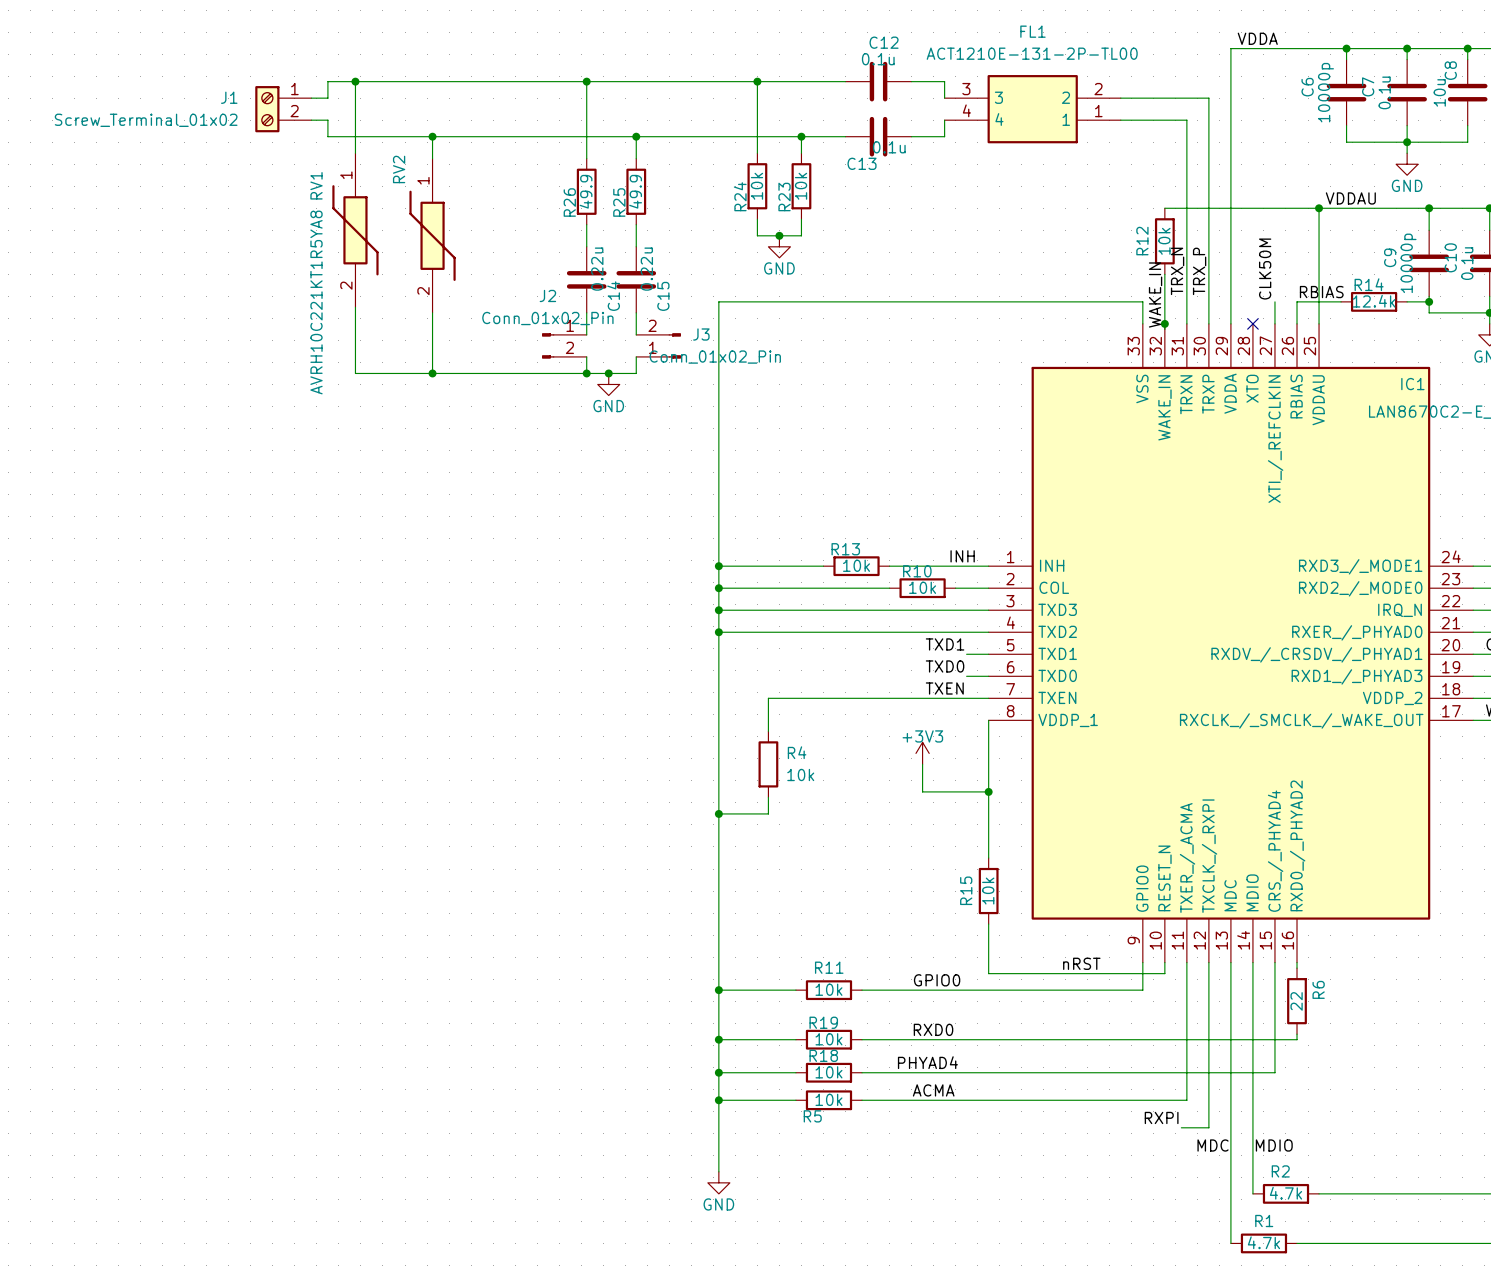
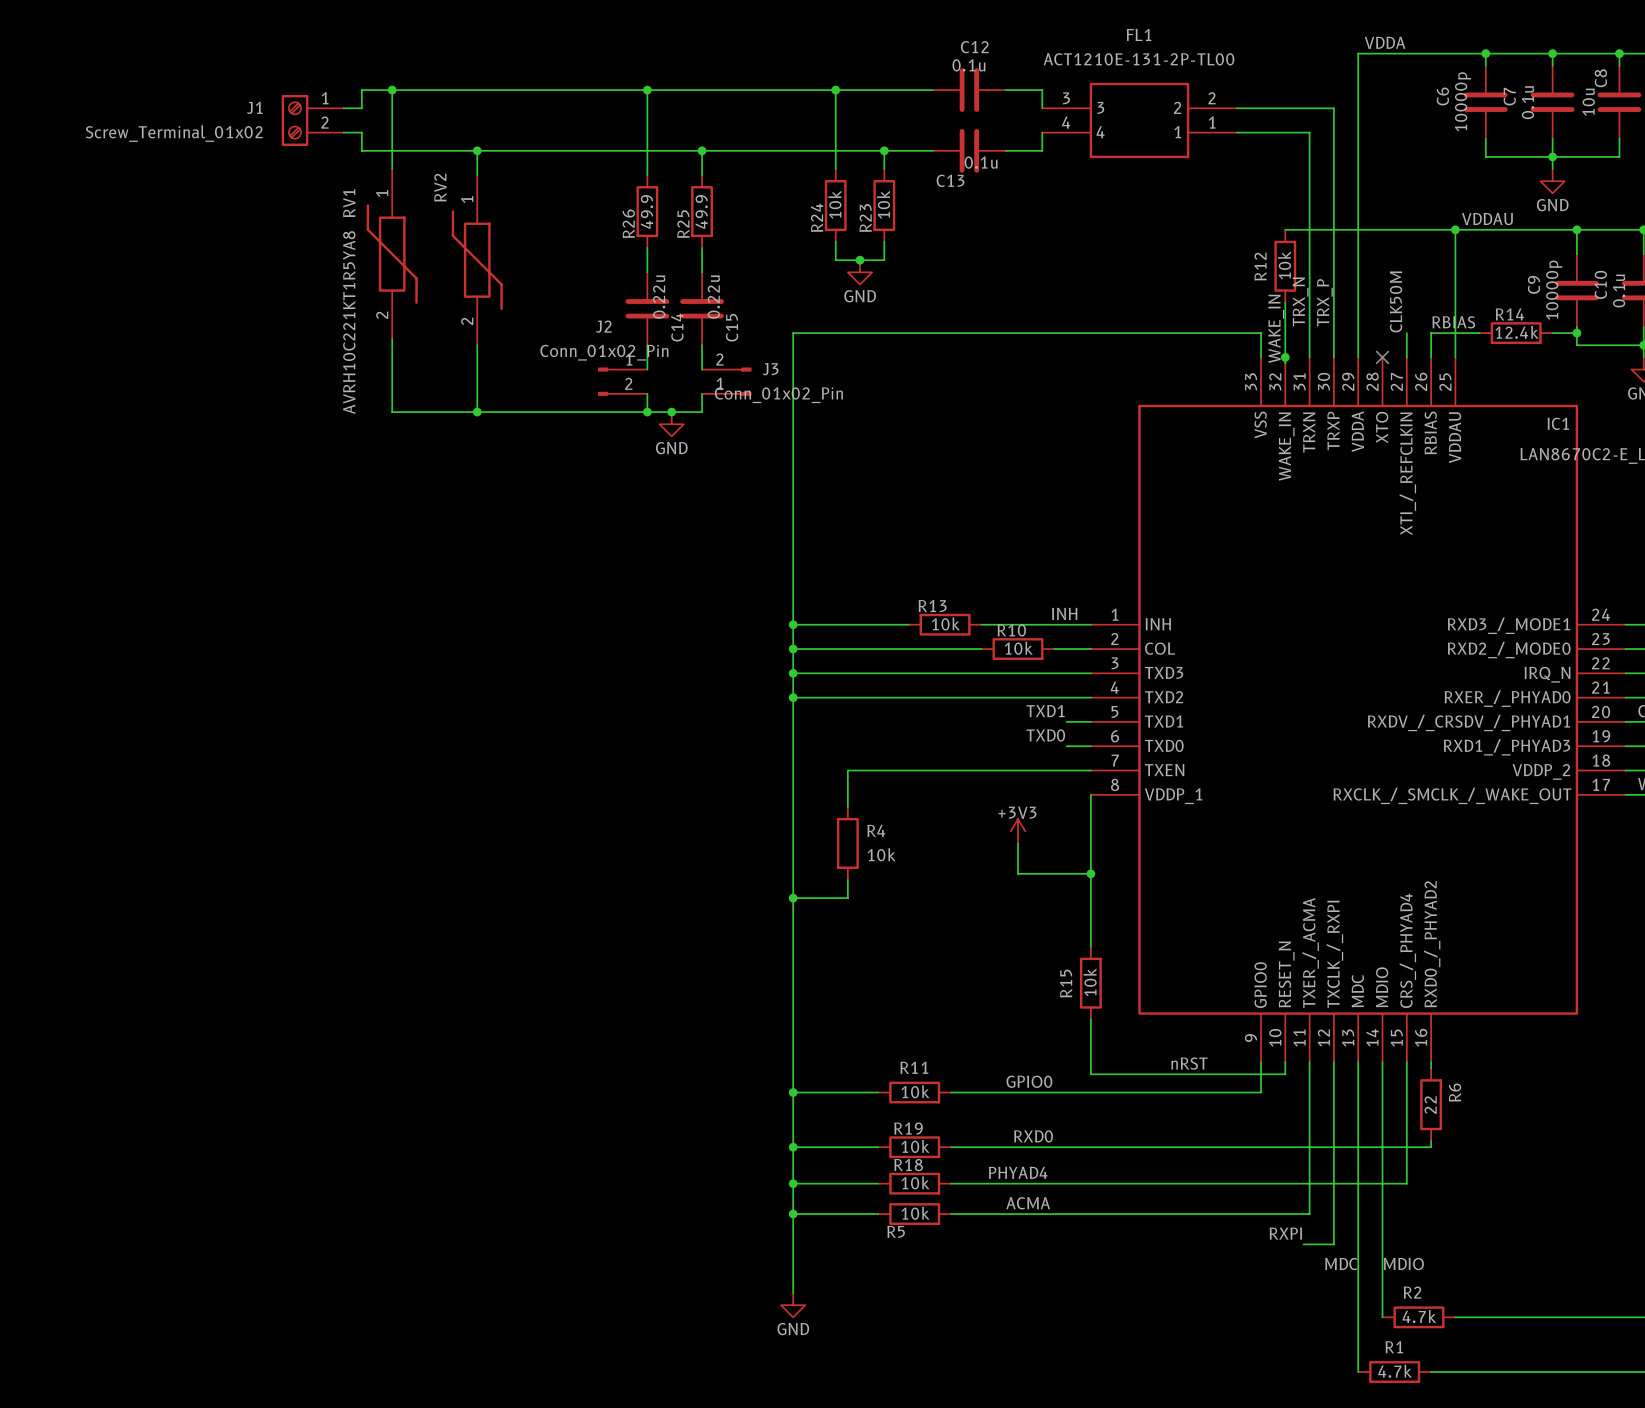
label: TXEN (944, 688) -> none

